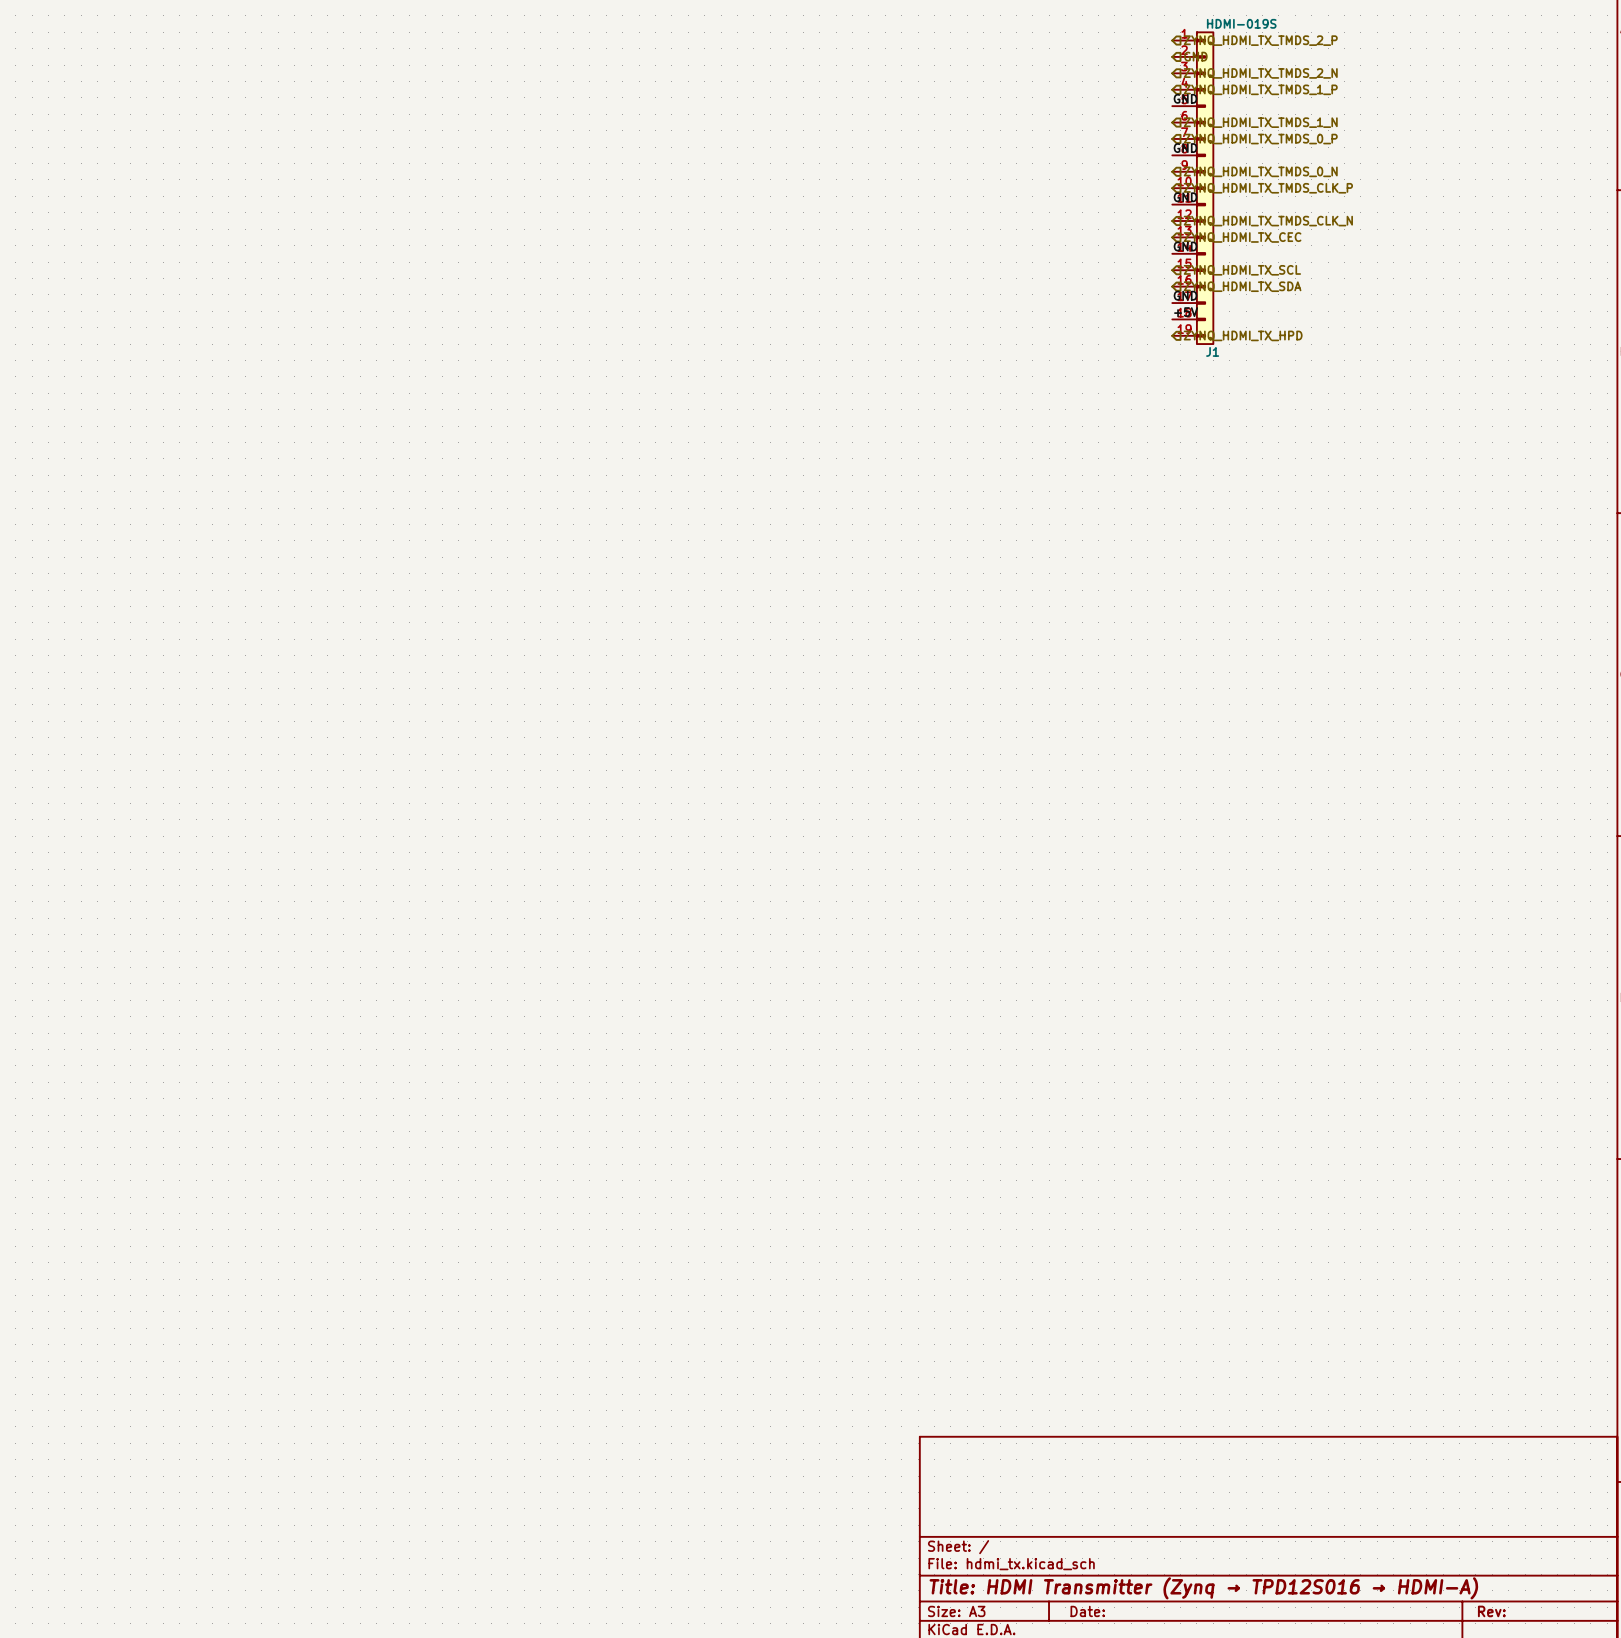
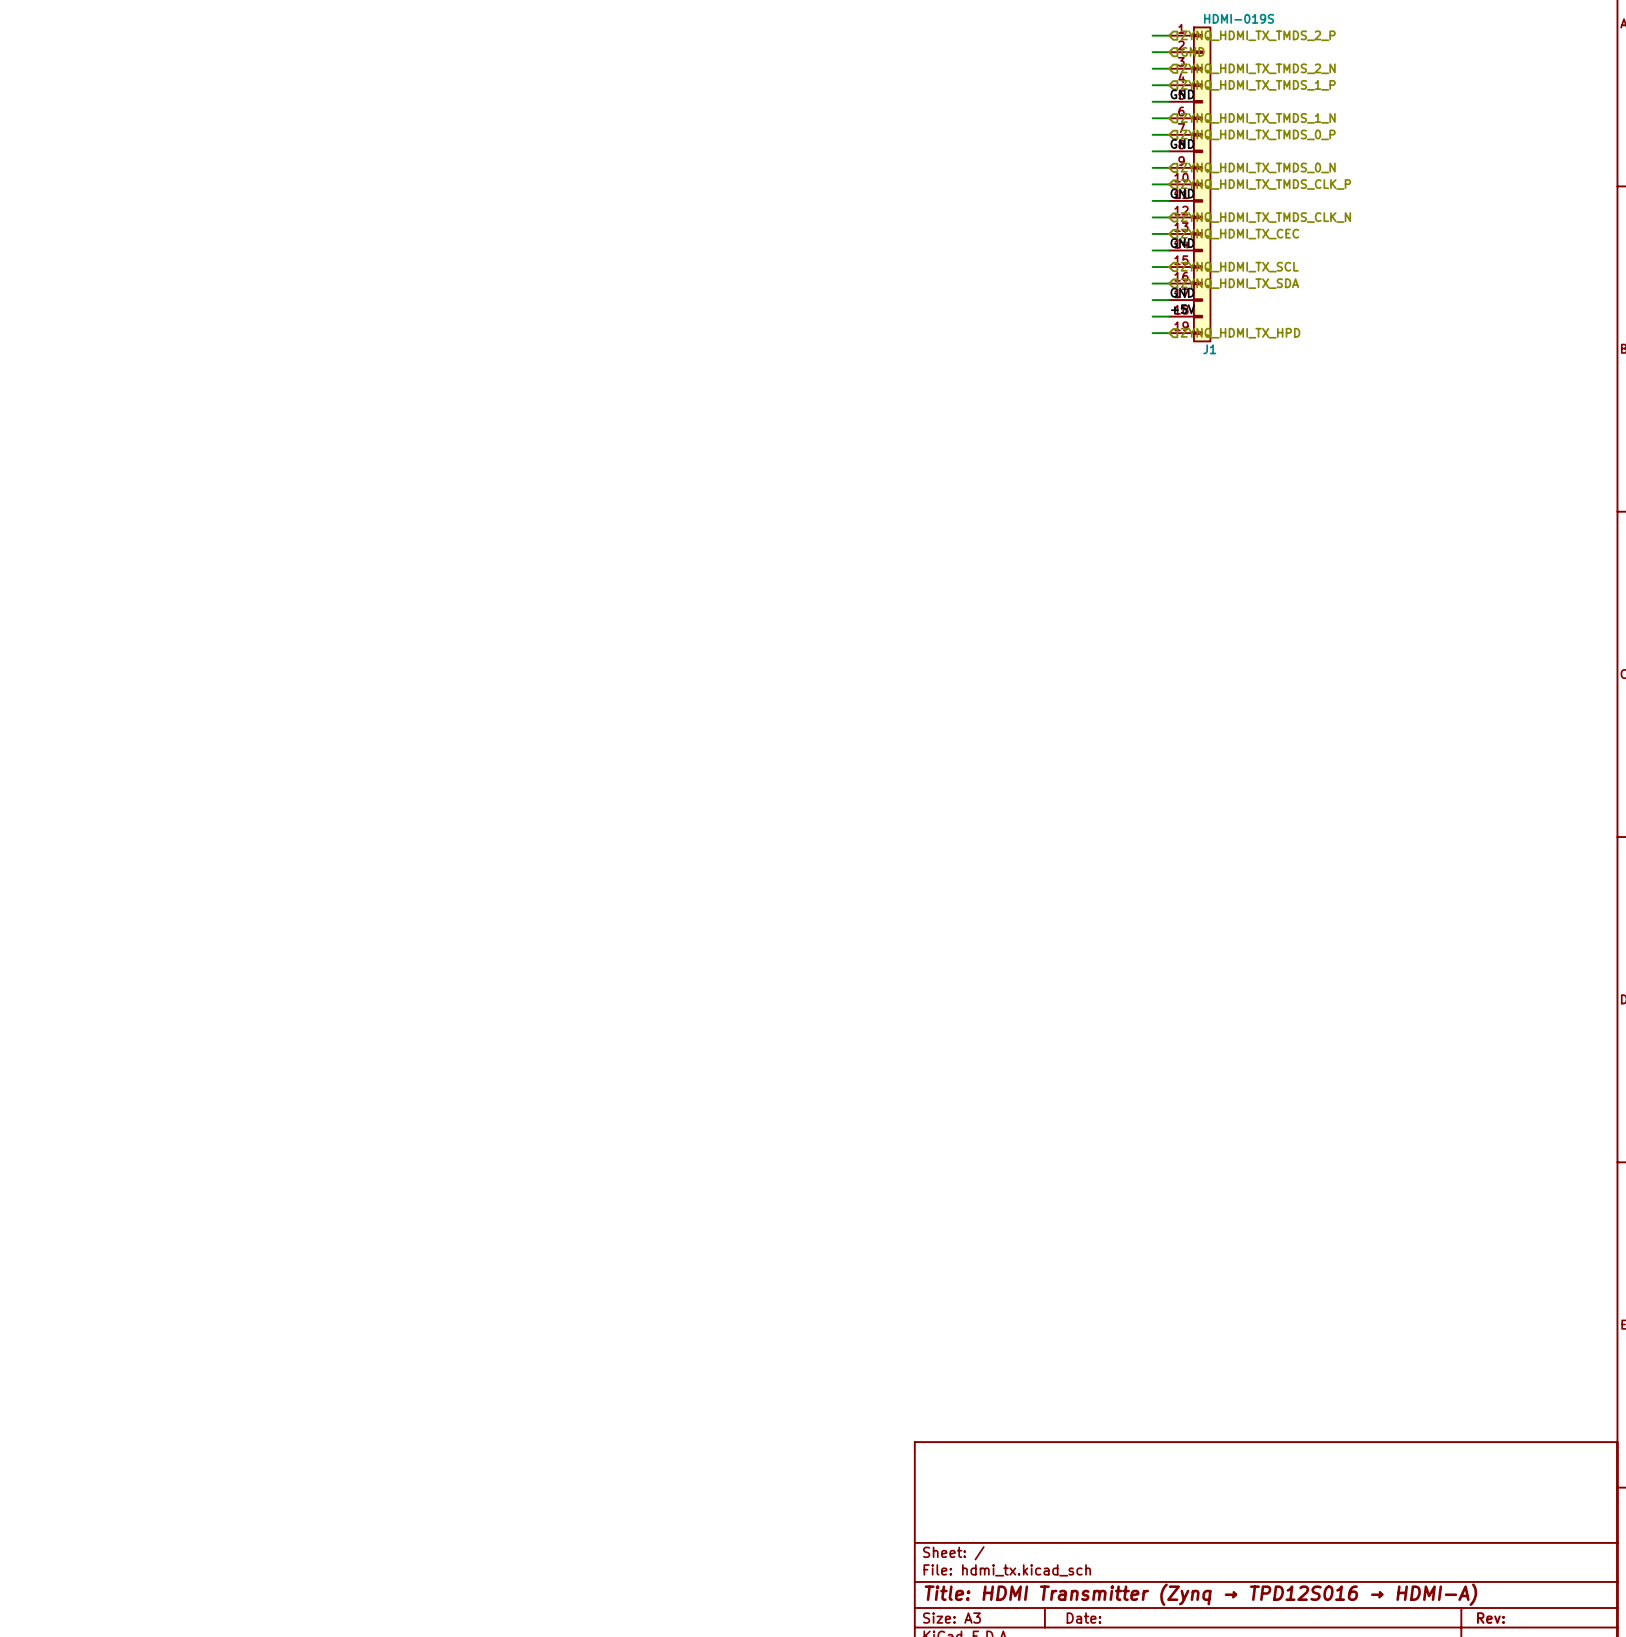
wire: none -> (1152, 35) (1169, 35)
wire: none -> (1152, 52) (1169, 52)
wire: none -> (1152, 68) (1169, 68)
wire: none -> (1152, 85) (1169, 85)
wire: none -> (1152, 101) (1169, 101)
wire: none -> (1152, 118) (1169, 118)
wire: none -> (1152, 134) (1169, 134)
wire: none -> (1152, 151) (1169, 151)
wire: none -> (1152, 167) (1169, 167)
wire: none -> (1152, 184) (1169, 184)
wire: none -> (1152, 200) (1169, 200)
wire: none -> (1152, 217) (1169, 217)
wire: none -> (1152, 233) (1169, 233)
wire: none -> (1152, 250) (1169, 250)
wire: none -> (1152, 267) (1169, 267)
wire: none -> (1152, 283) (1169, 283)
wire: none -> (1152, 300) (1169, 300)
wire: none -> (1152, 316) (1169, 316)
wire: none -> (1152, 333) (1169, 333)

